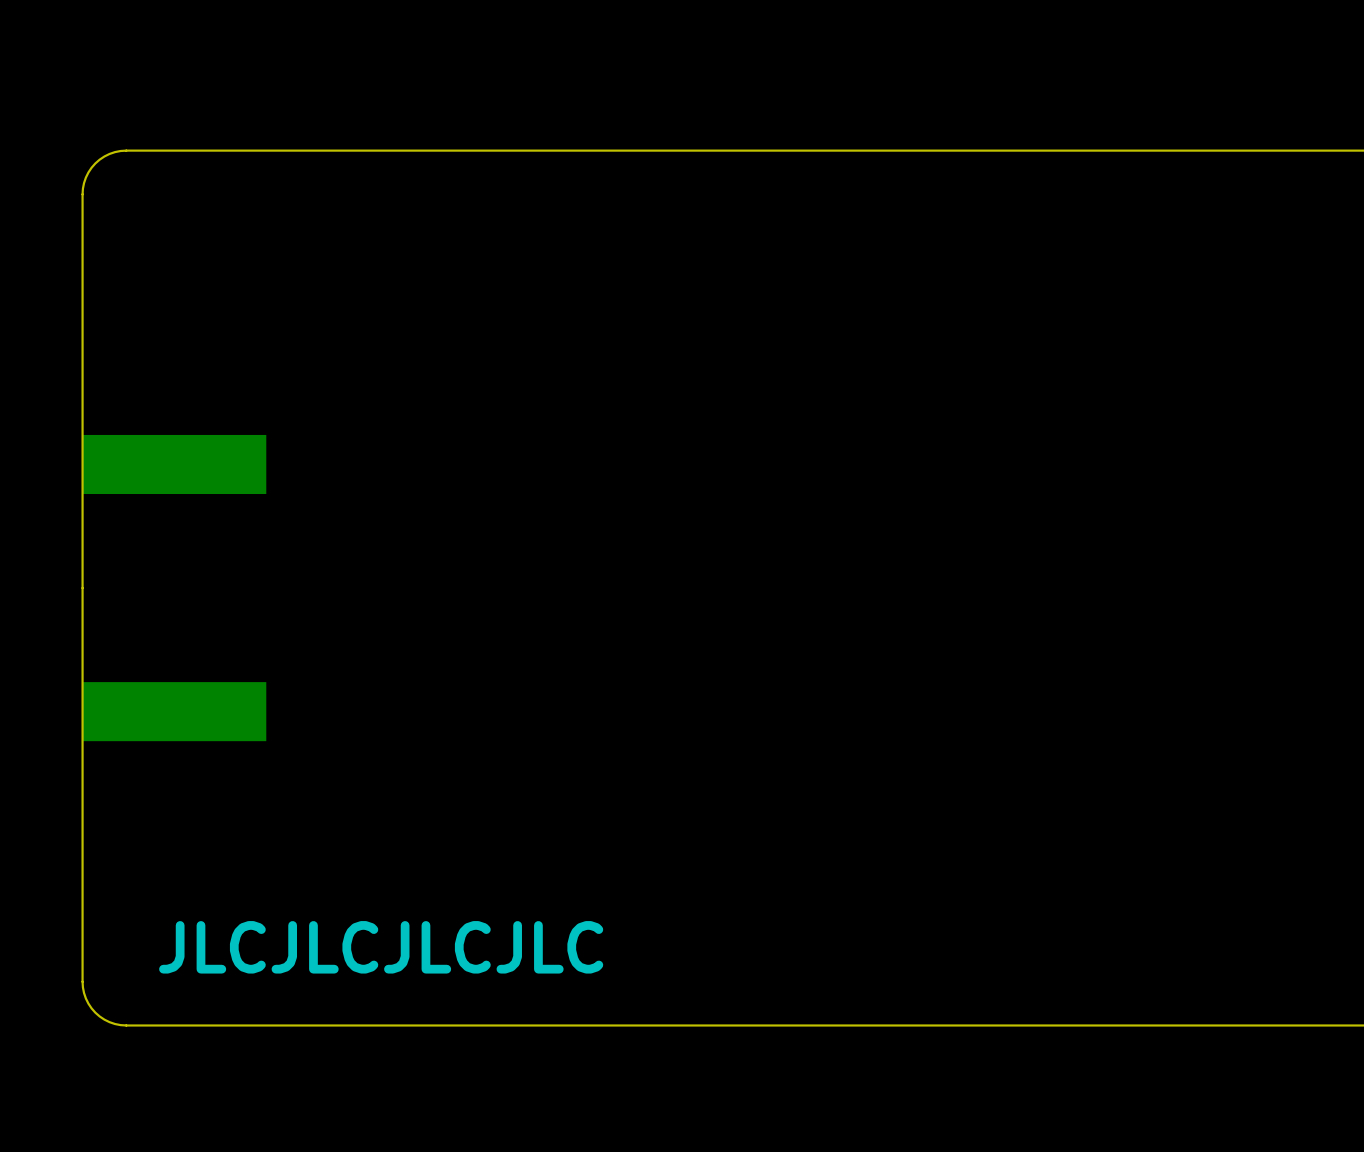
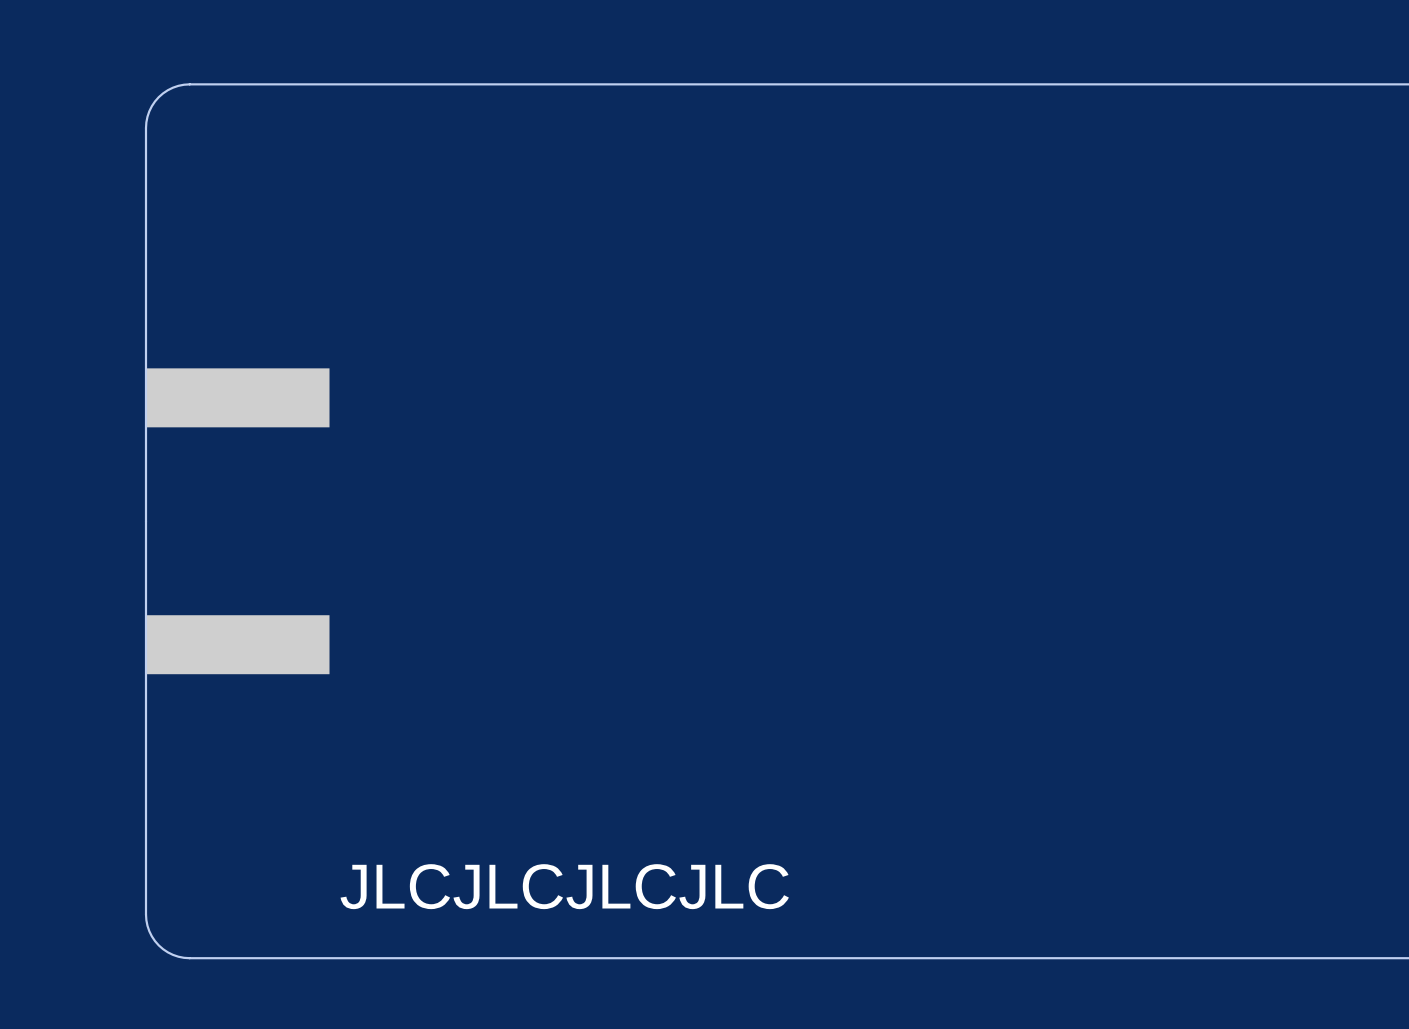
text position: JLCJLCJLCJLC (381, 947) -> JLCJLCJLCJLC (564, 886)

